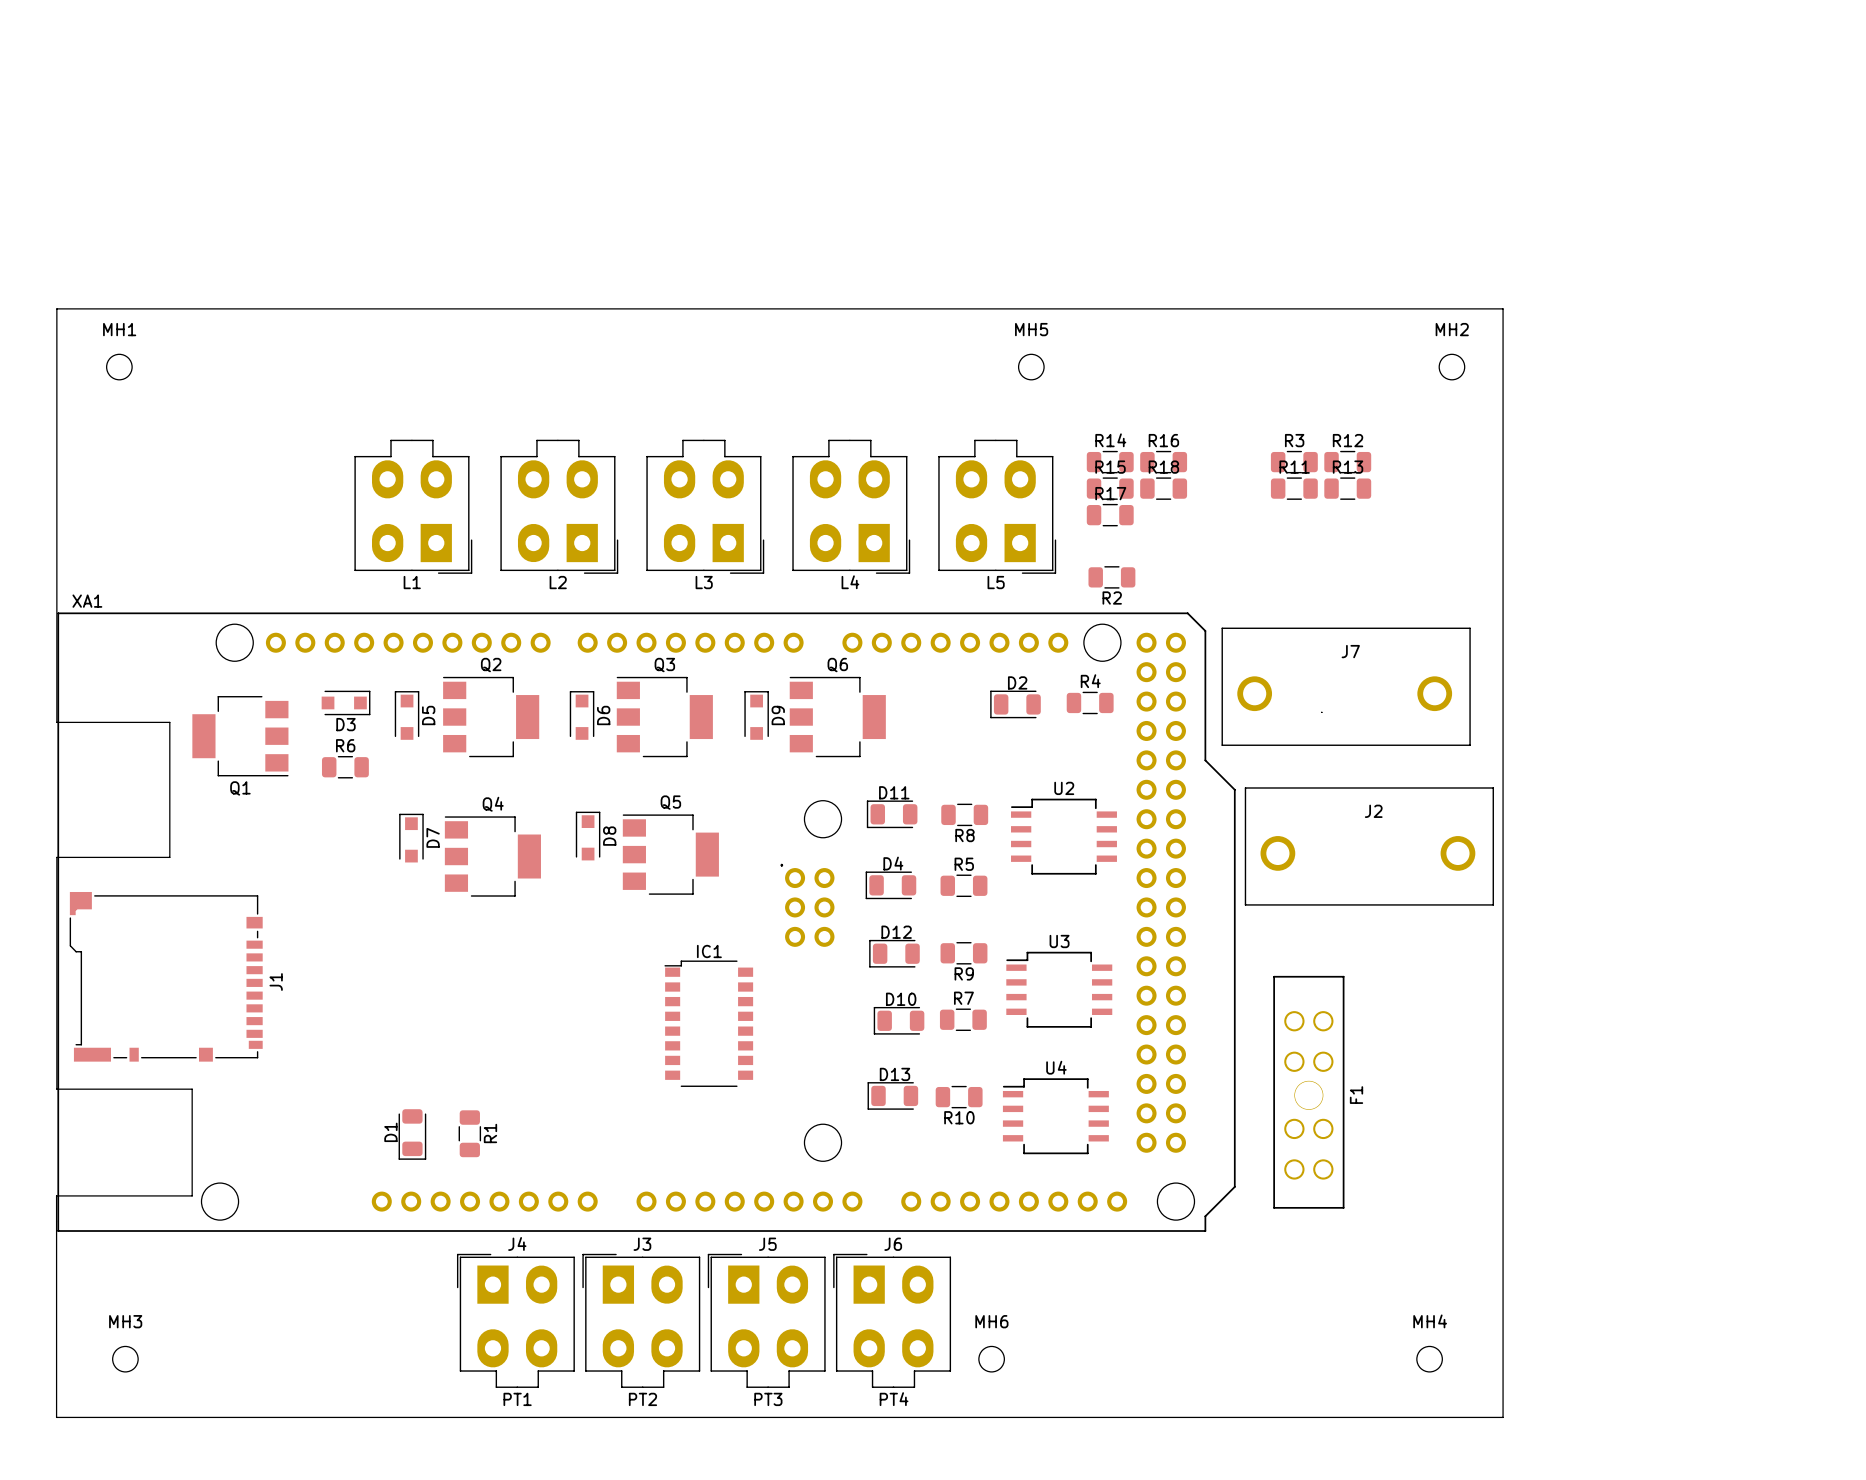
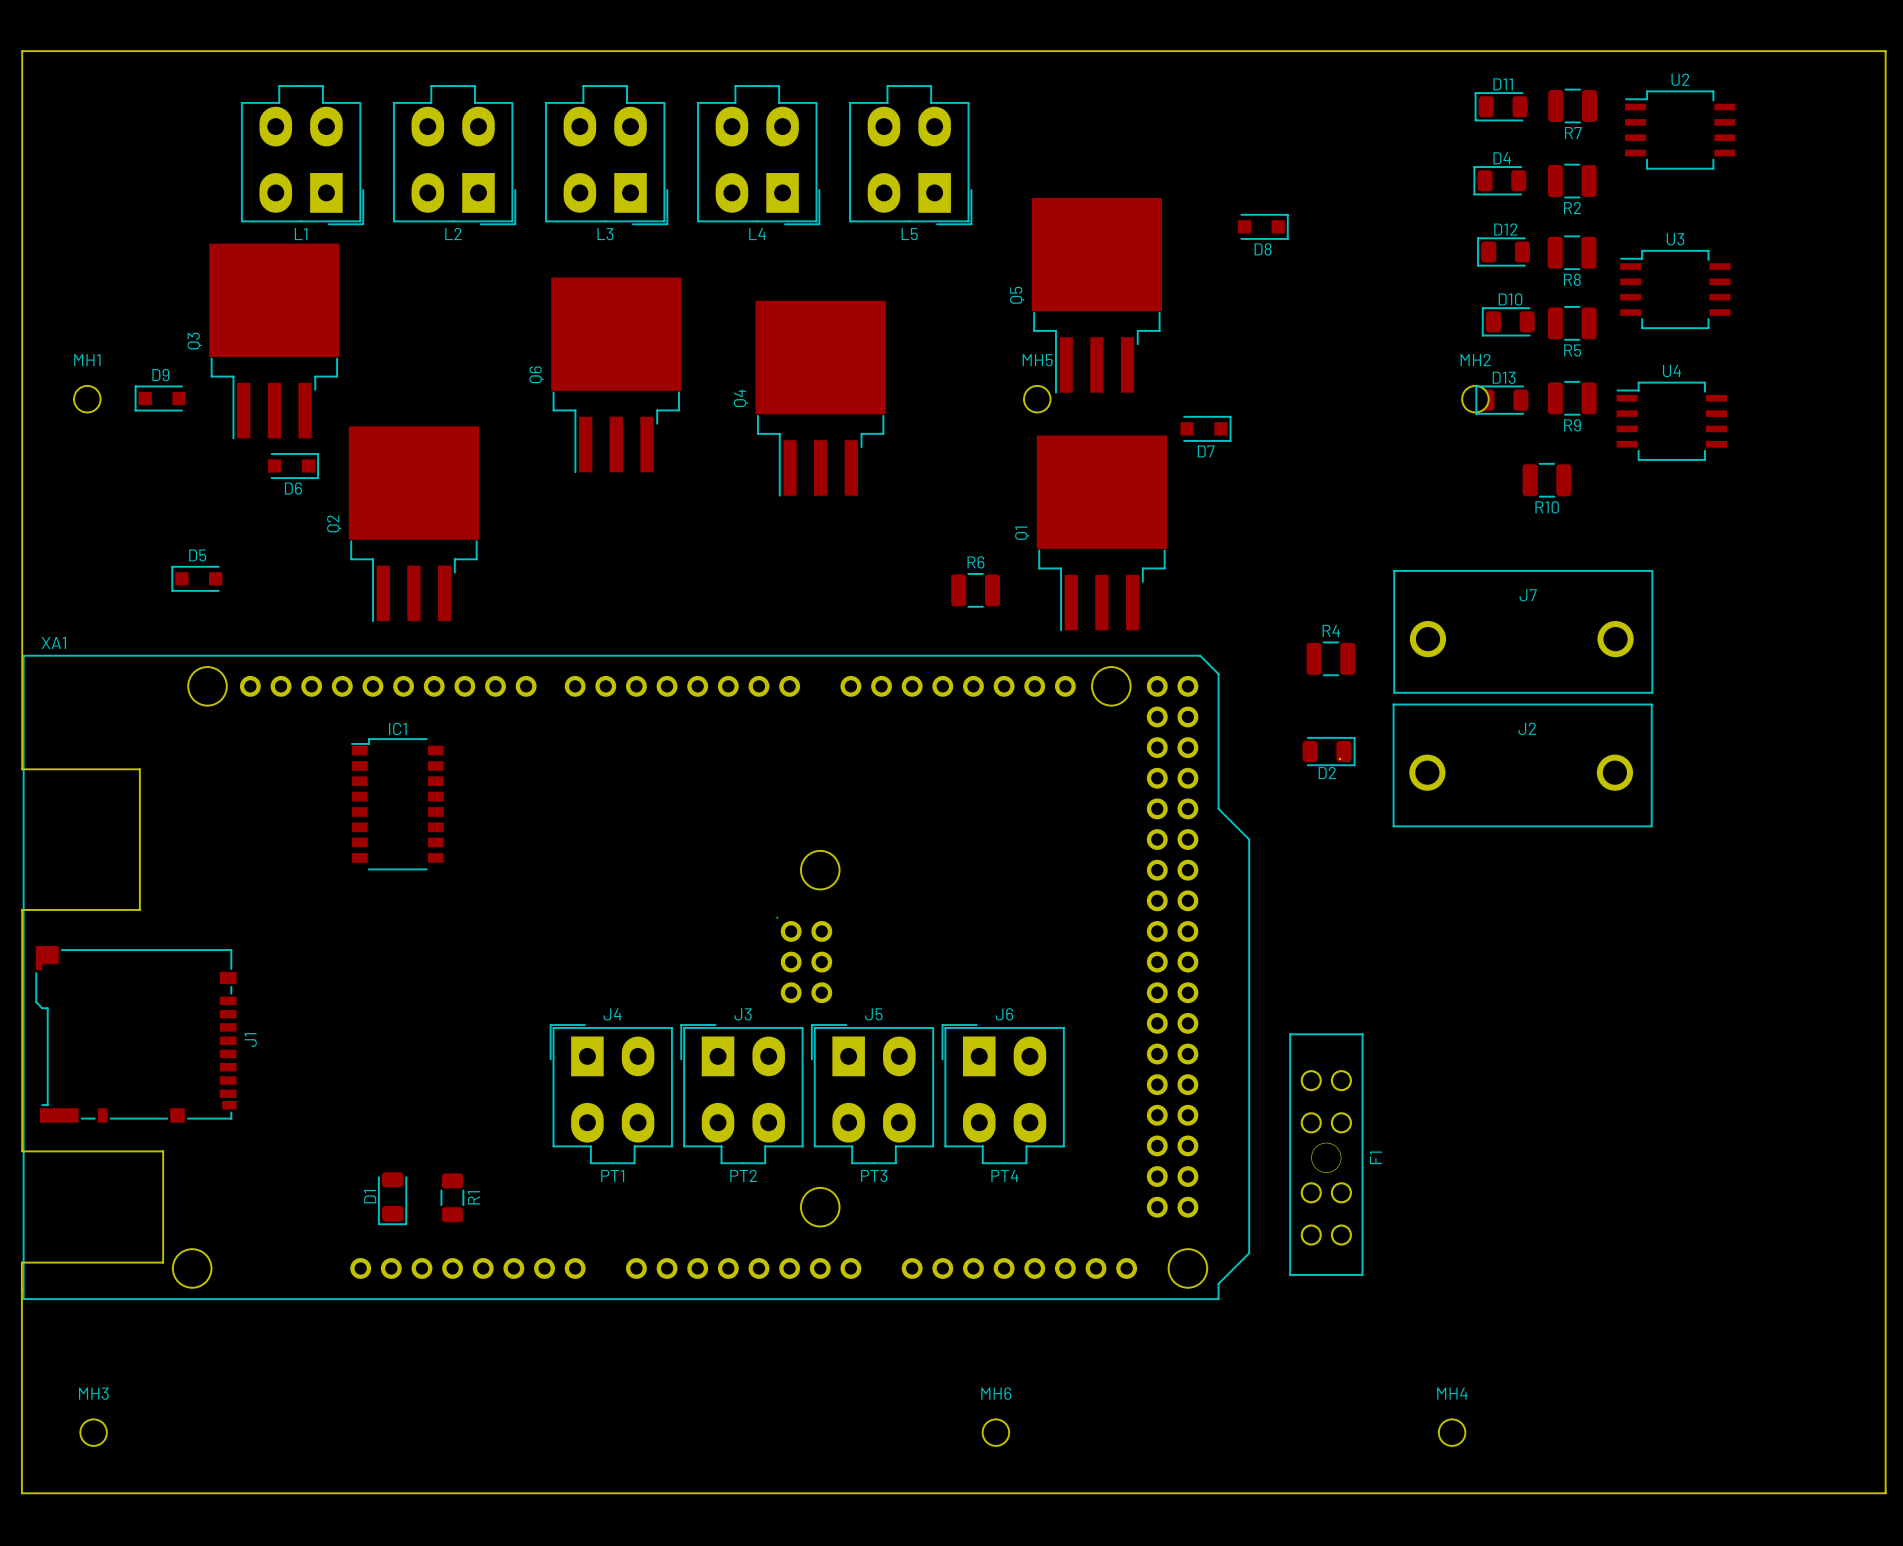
board edge: (56, 308) (1503, 308) (1503, 1417) -> (22, 338) (22, 51) (1885, 51) (1885, 1493) (1528, 1493)
R14: (1110, 462) -> none
R16: (1163, 462) -> none
R3: (1294, 462) -> none
R12: (1347, 462) -> none
R15: (1110, 488) -> none
R18: (1163, 488) -> none
R11: (1294, 488) -> none
R13: (1347, 488) -> none
L1 position: (413, 506) -> (302, 155)
L2 position: (559, 506) -> (454, 155)
L3 position: (705, 506) -> (606, 155)
L4 position: (851, 506) -> (758, 155)
L5 position: (997, 506) -> (910, 155)
R17: (1110, 515) -> none
R2 footprint: [1088, 566, 1136, 589] -> [1547, 163, 1597, 199]
Q2 name position: Q2 (491, 665) -> Q2 (334, 523)
Q3 name position: Q3 (664, 665) -> Q3 (194, 341)
Q6 name position: Q6 (837, 665) -> Q6 (536, 374)
Q2 footprint: [442, 676, 540, 758] -> [348, 426, 480, 622]
Q3 footprint: [616, 676, 713, 758] -> [209, 243, 340, 440]
Q6 footprint: [789, 676, 886, 758] -> [551, 277, 682, 473]
J7 position: (1346, 686) -> (1523, 631)
R4 footprint: [1066, 691, 1114, 715] -> [1306, 641, 1356, 676]
Q1 footprint: [192, 696, 289, 777] -> [1036, 435, 1168, 632]
D3: (346, 702) -> none
D2 rotation: 0° (1015, 704) -> 180° (1328, 751)
D2 position: (1015, 704) -> (1328, 751)
D5 rotation: 0° (407, 715) -> 90° counterclockwise (196, 578)
D5 position: (407, 715) -> (196, 578)
D6 rotation: 0° (582, 715) -> 90° clockwise (293, 465)
D6 position: (582, 715) -> (293, 465)
D9 rotation: 0° (756, 715) -> 90° counterclockwise (160, 398)
D9 position: (756, 715) -> (160, 398)
R6 footprint: [321, 756, 369, 779] -> [951, 573, 1001, 608]
Q1 name position: Q1 (240, 788) -> Q1 (1022, 533)
Q5 name position: Q5 (670, 802) -> Q5 (1017, 295)
R8 footprint: [941, 803, 989, 827] -> [1547, 235, 1597, 270]
Q4 name position: Q4 (493, 804) -> Q4 (740, 398)
Q5 footprint: [622, 814, 719, 895] -> [1031, 197, 1163, 394]
D11 position: (892, 814) -> (1501, 106)
Q4 footprint: [444, 816, 541, 897] -> [755, 300, 886, 497]
D8 rotation: 0° (588, 836) -> 90° clockwise (1263, 226)
D8 position: (588, 836) -> (1263, 226)
U2 position: (1063, 836) -> (1680, 130)
D7 rotation: 0° (411, 838) -> 90° clockwise (1205, 428)
D7 position: (411, 838) -> (1205, 428)
J2 position: (1369, 846) -> (1522, 765)
R5 name position: R5 (964, 864) -> R5 (1572, 350)
R5 footprint: [940, 874, 988, 898] -> [1547, 306, 1597, 341]
D4 position: (890, 885) -> (1499, 180)
R9 footprint: [940, 942, 988, 965] -> [1547, 381, 1597, 416]
D12 position: (894, 953) -> (1503, 251)
U3 position: (1059, 989) -> (1675, 289)
R7 name position: R7 (963, 998) -> R7 (1573, 133)
R7 footprint: [939, 1008, 987, 1031] -> [1548, 88, 1598, 124]
D10 position: (899, 1020) -> (1508, 321)
IC1 position: (708, 1023) -> (397, 804)
R10 footprint: [935, 1085, 983, 1109] -> [1522, 463, 1572, 498]
D13 position: (892, 1095) -> (1501, 400)
U4 position: (1055, 1116) -> (1671, 421)
J4 position: (515, 1320) -> (611, 1094)
J3 position: (641, 1320) -> (741, 1094)
J5 position: (766, 1320) -> (872, 1094)
J6 position: (892, 1320) -> (1003, 1094)

